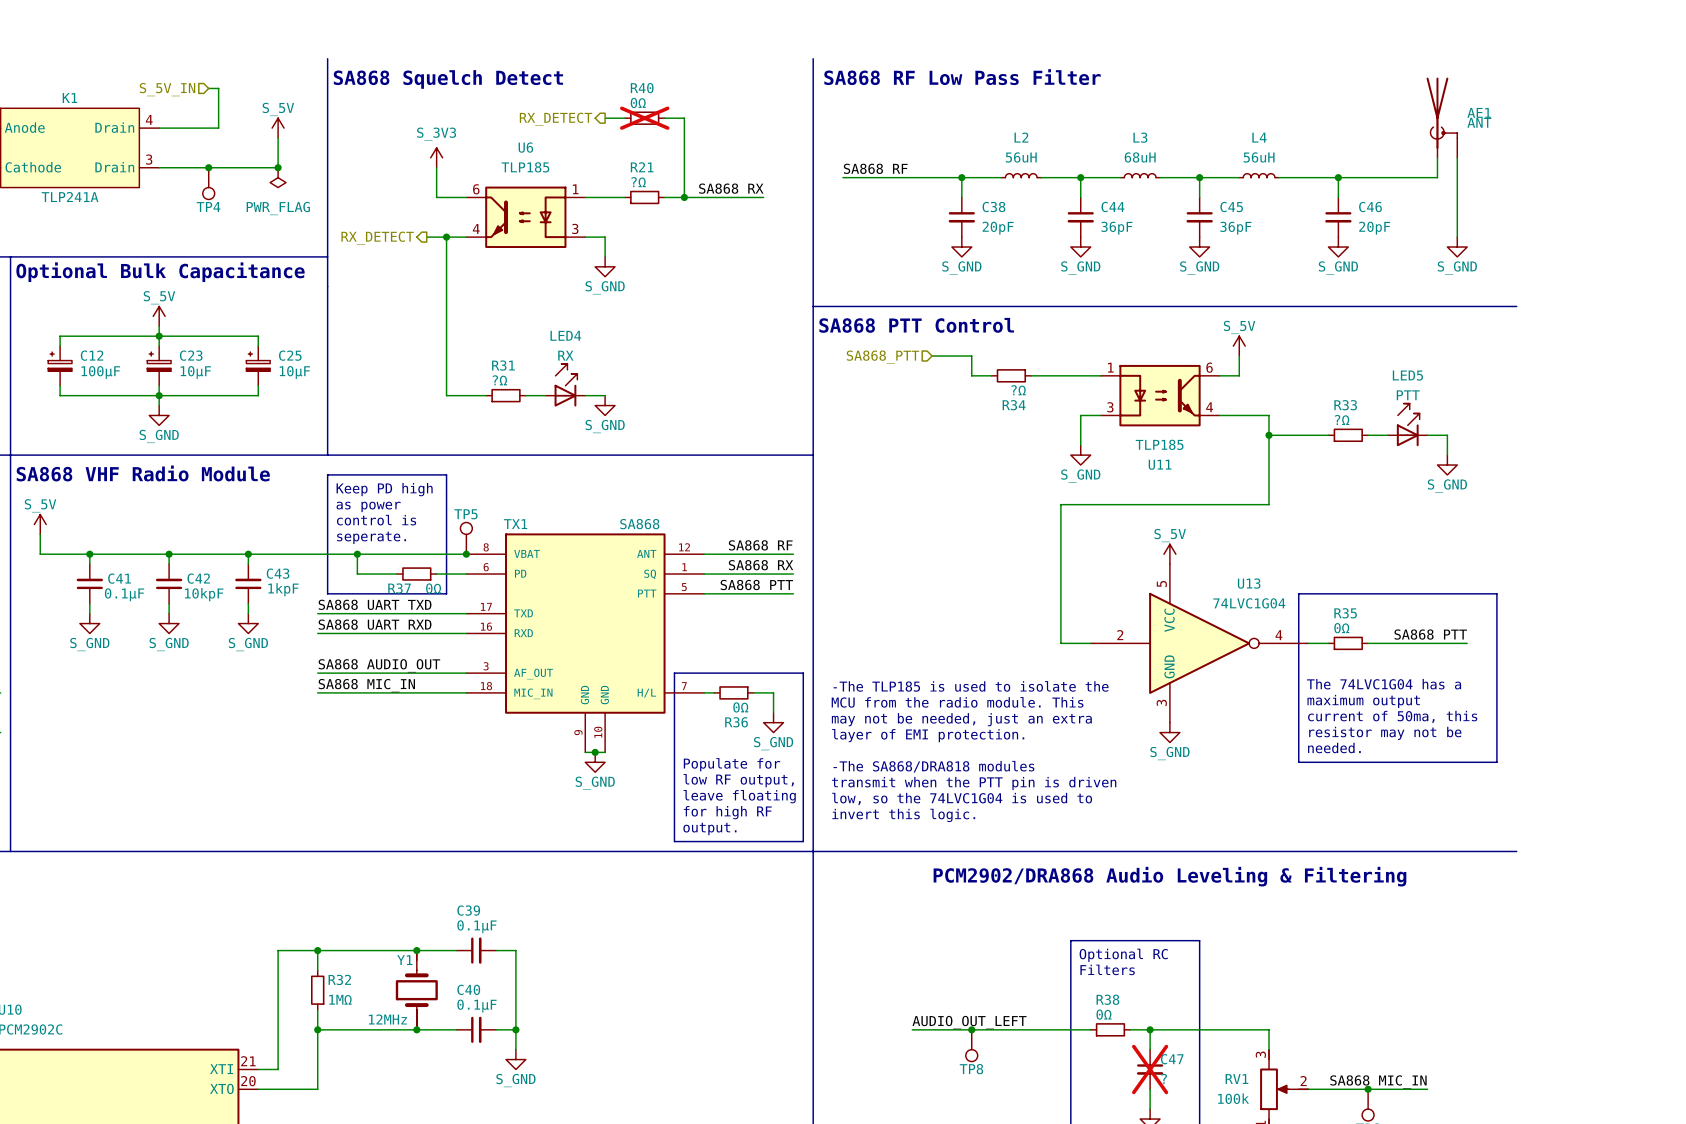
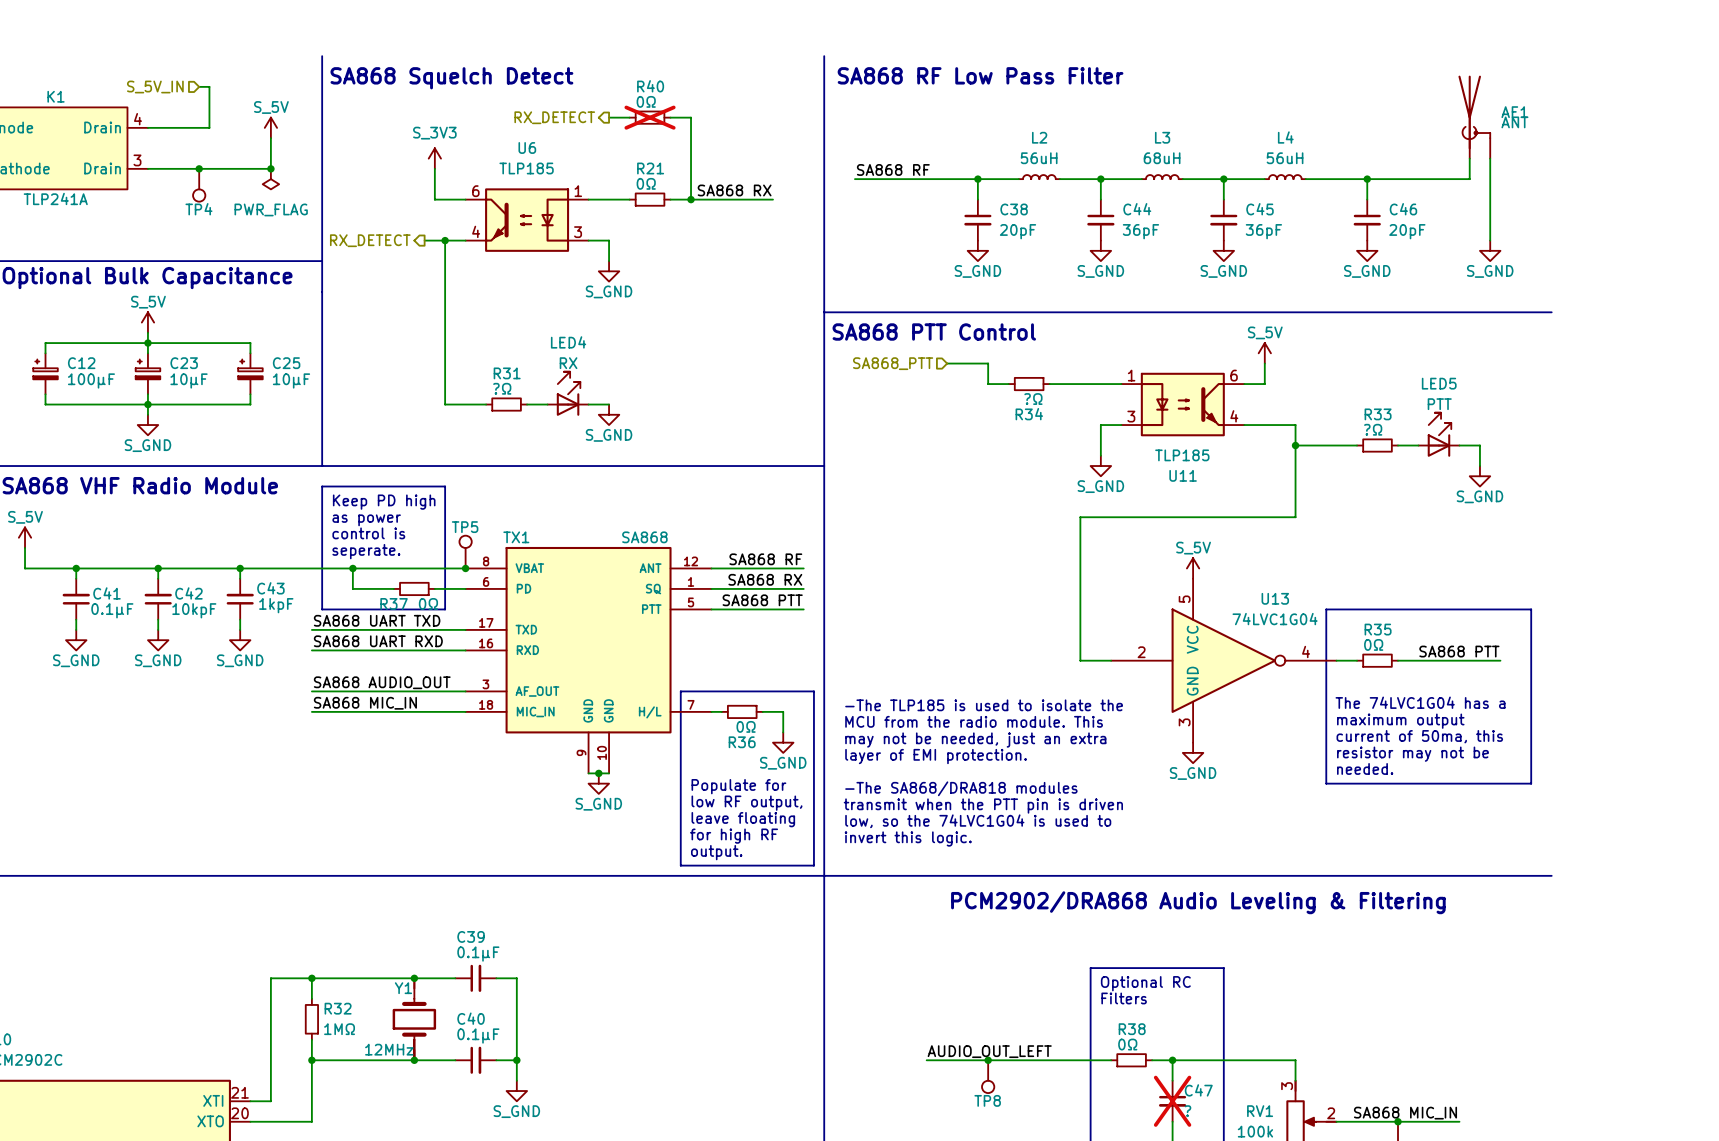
R21 value: ?Ω (638, 182) -> 0Ω (646, 183)

